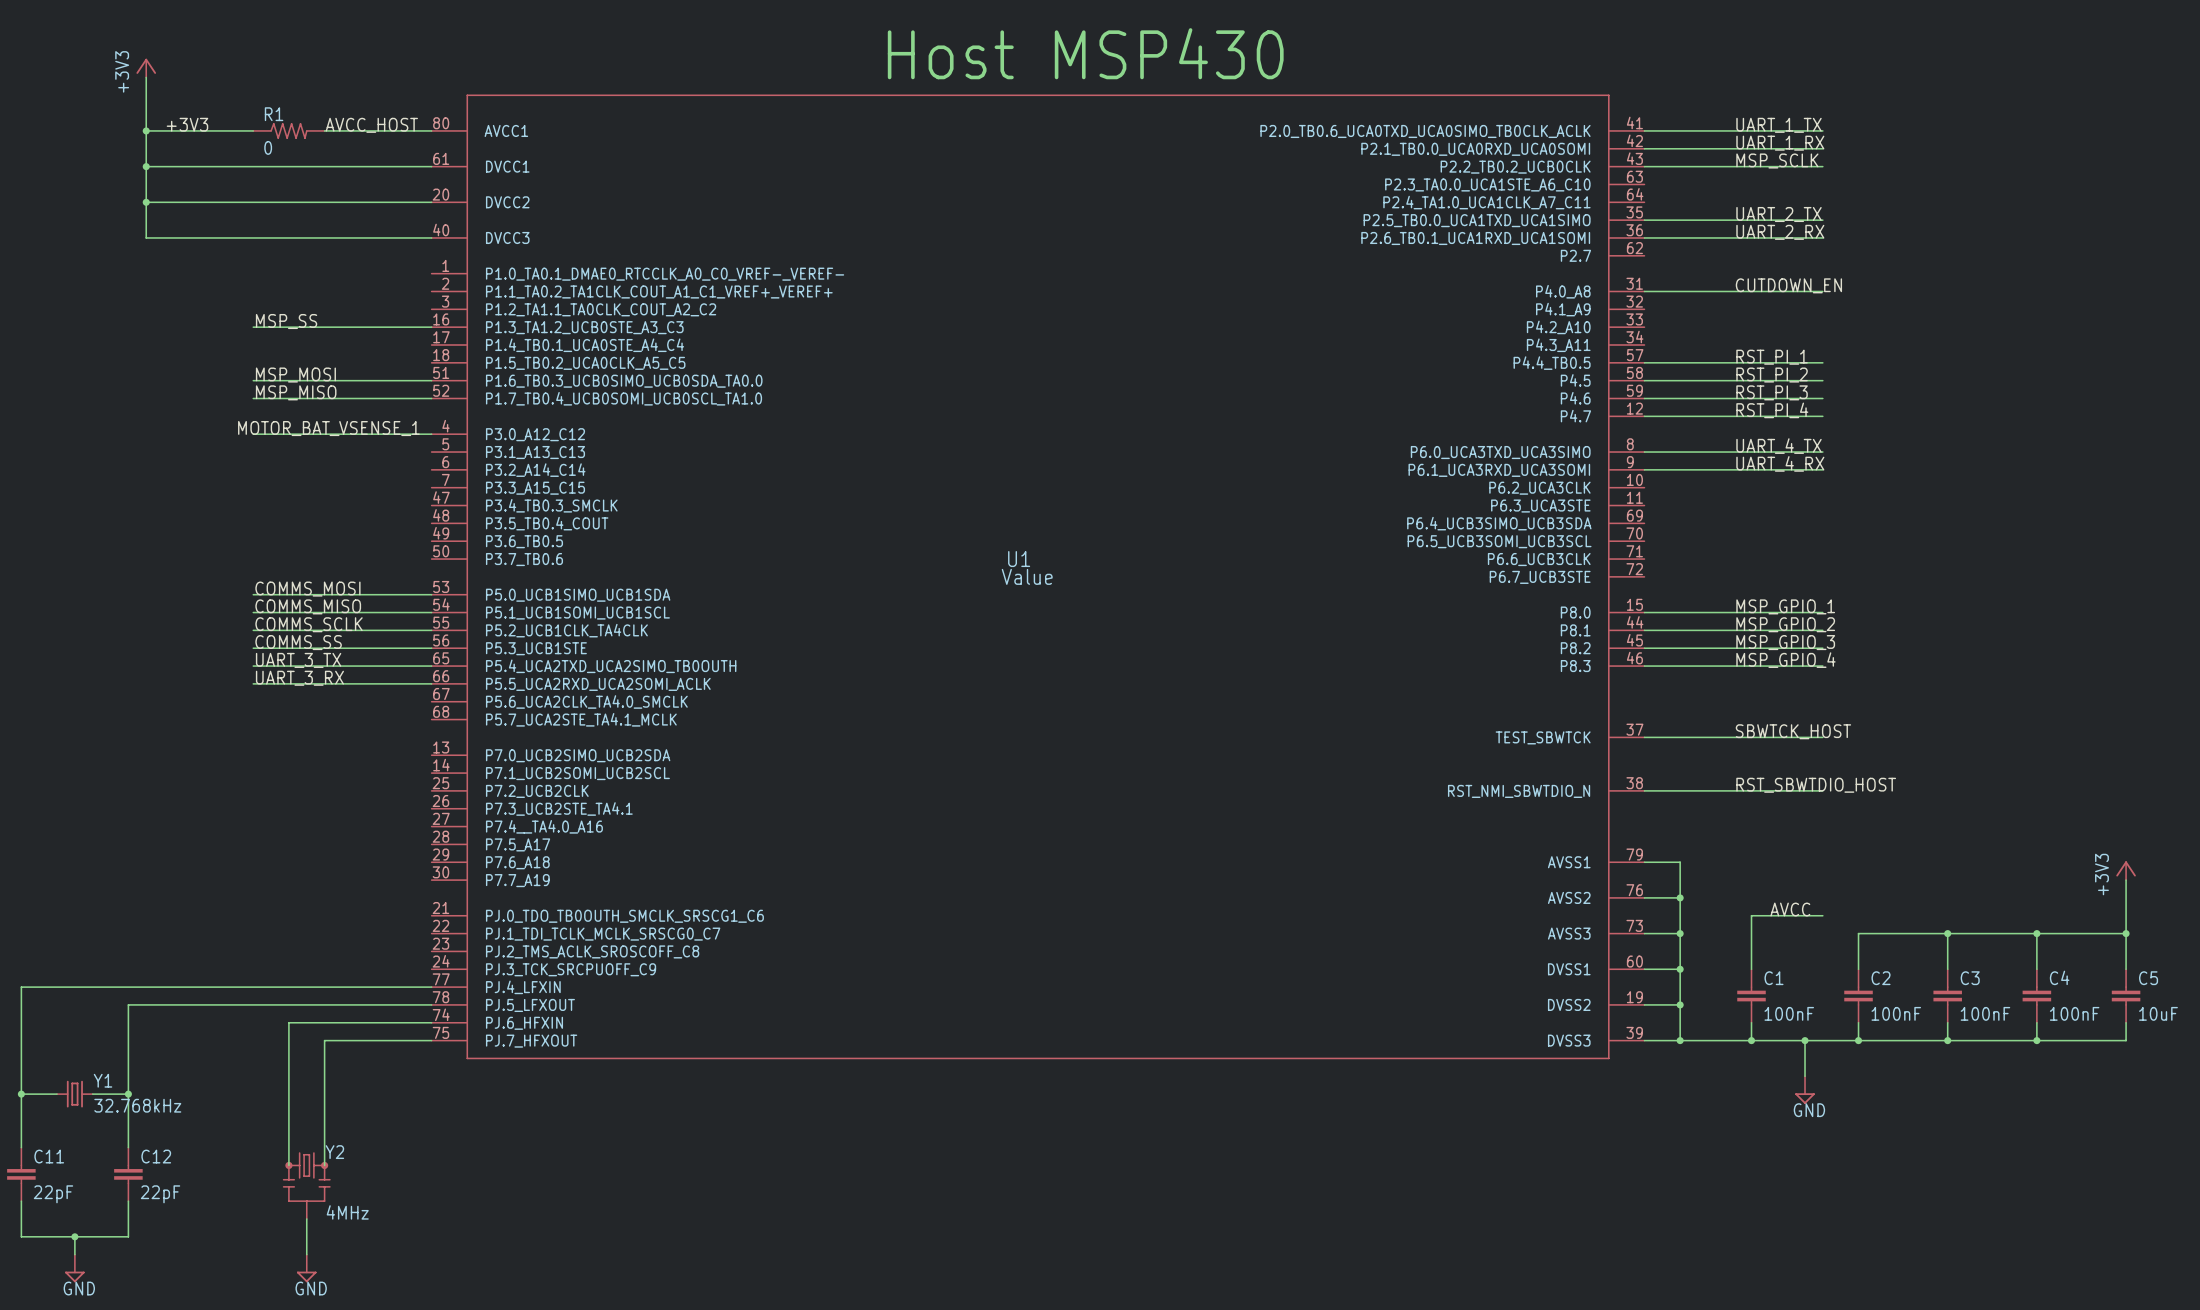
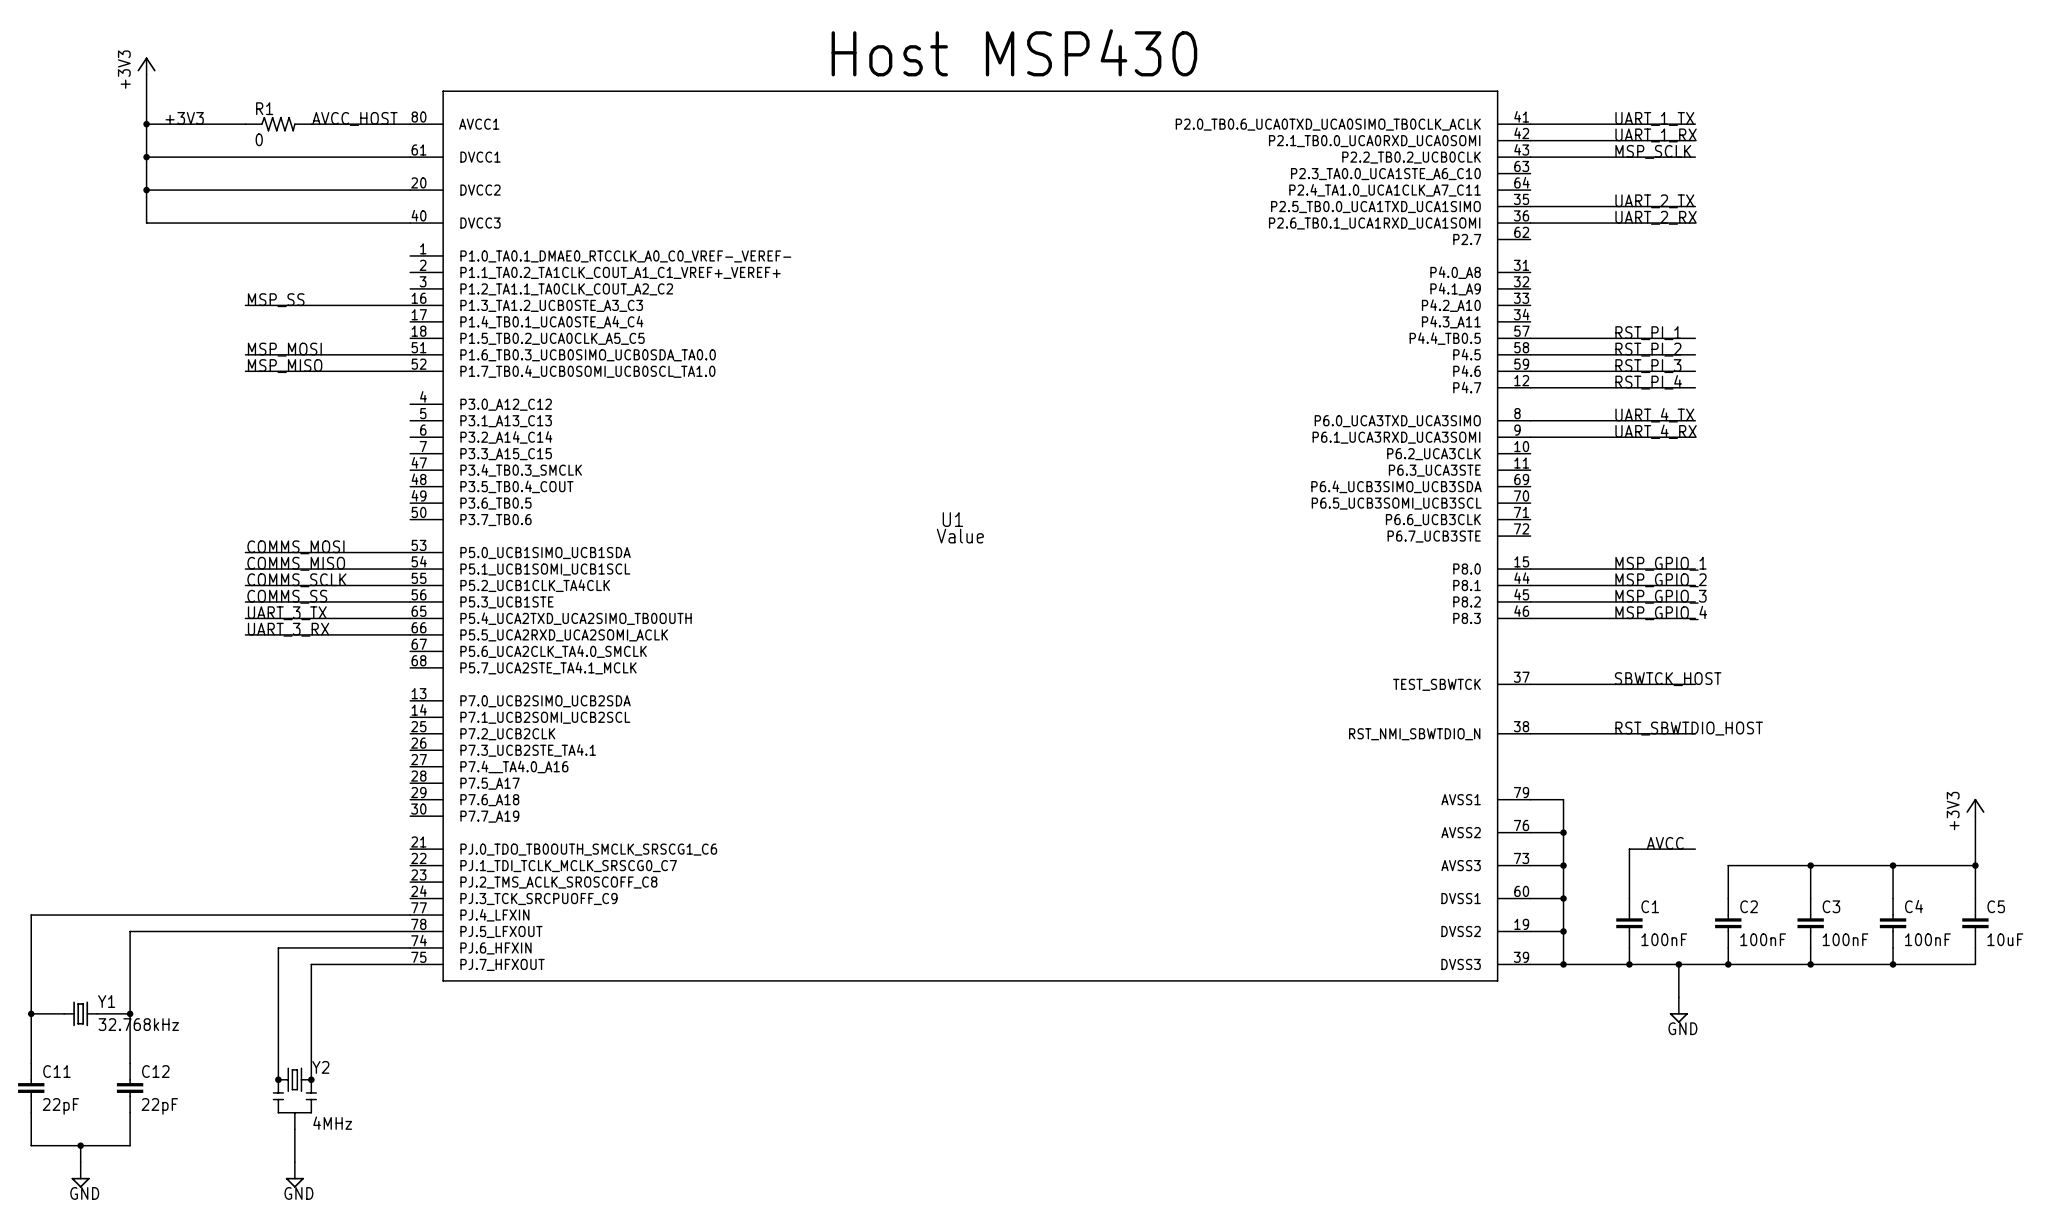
label: CUTDOWN_EN (1788, 285) -> none
wire: (1644, 291) (1822, 291) -> none
label: MOTOR_BAT_VSENSE_1 (328, 428) -> none
wire: (253, 434) (431, 434) -> none

